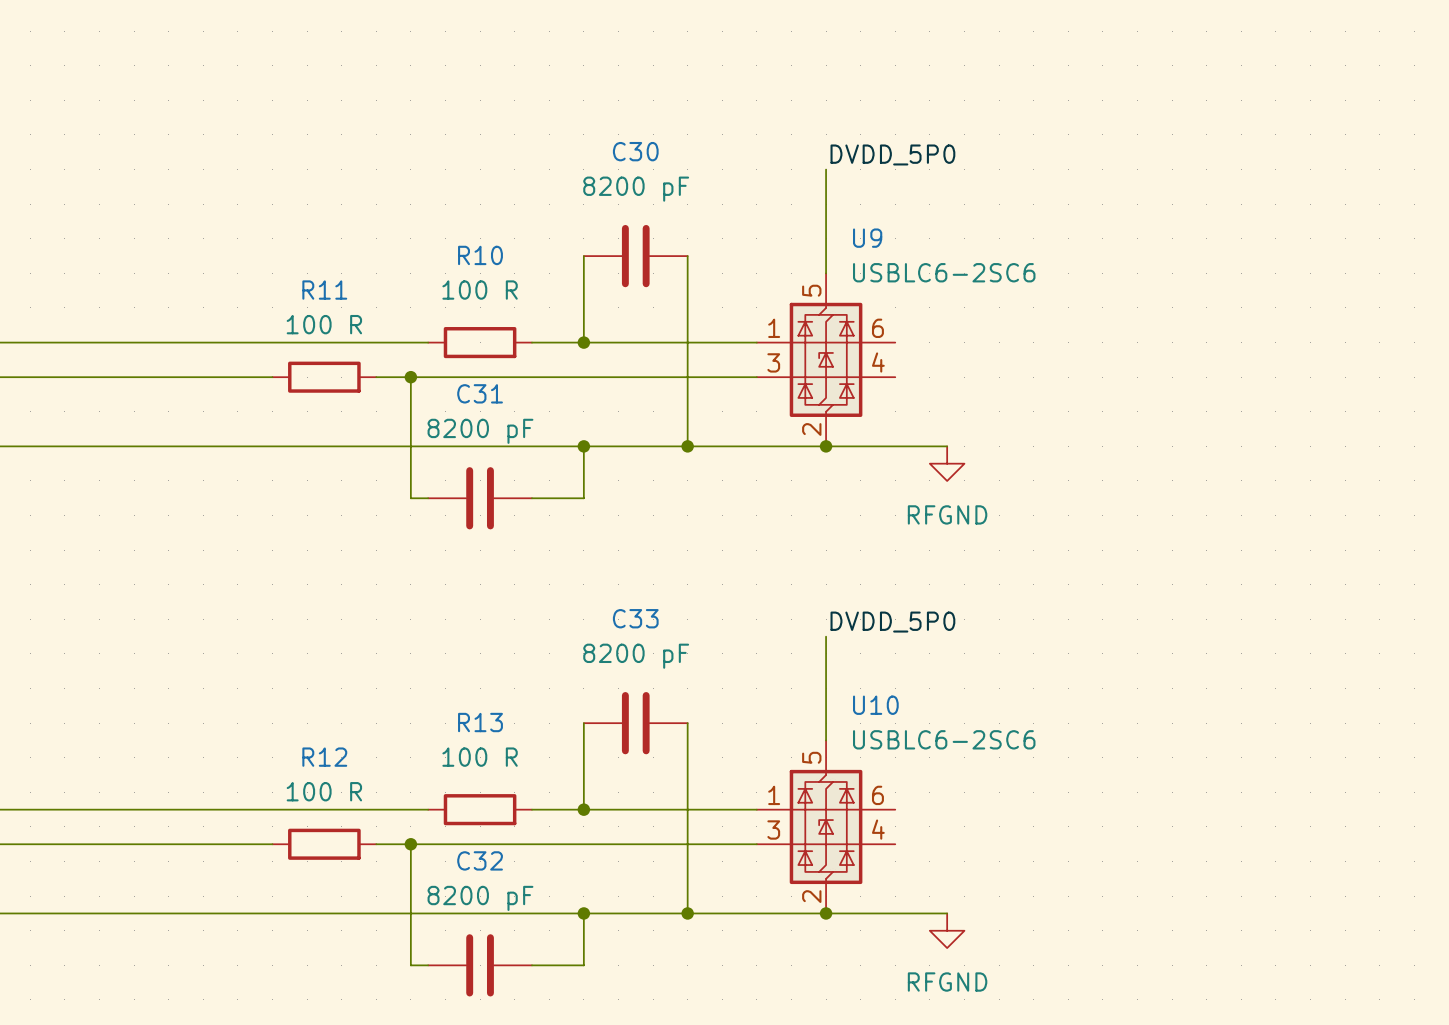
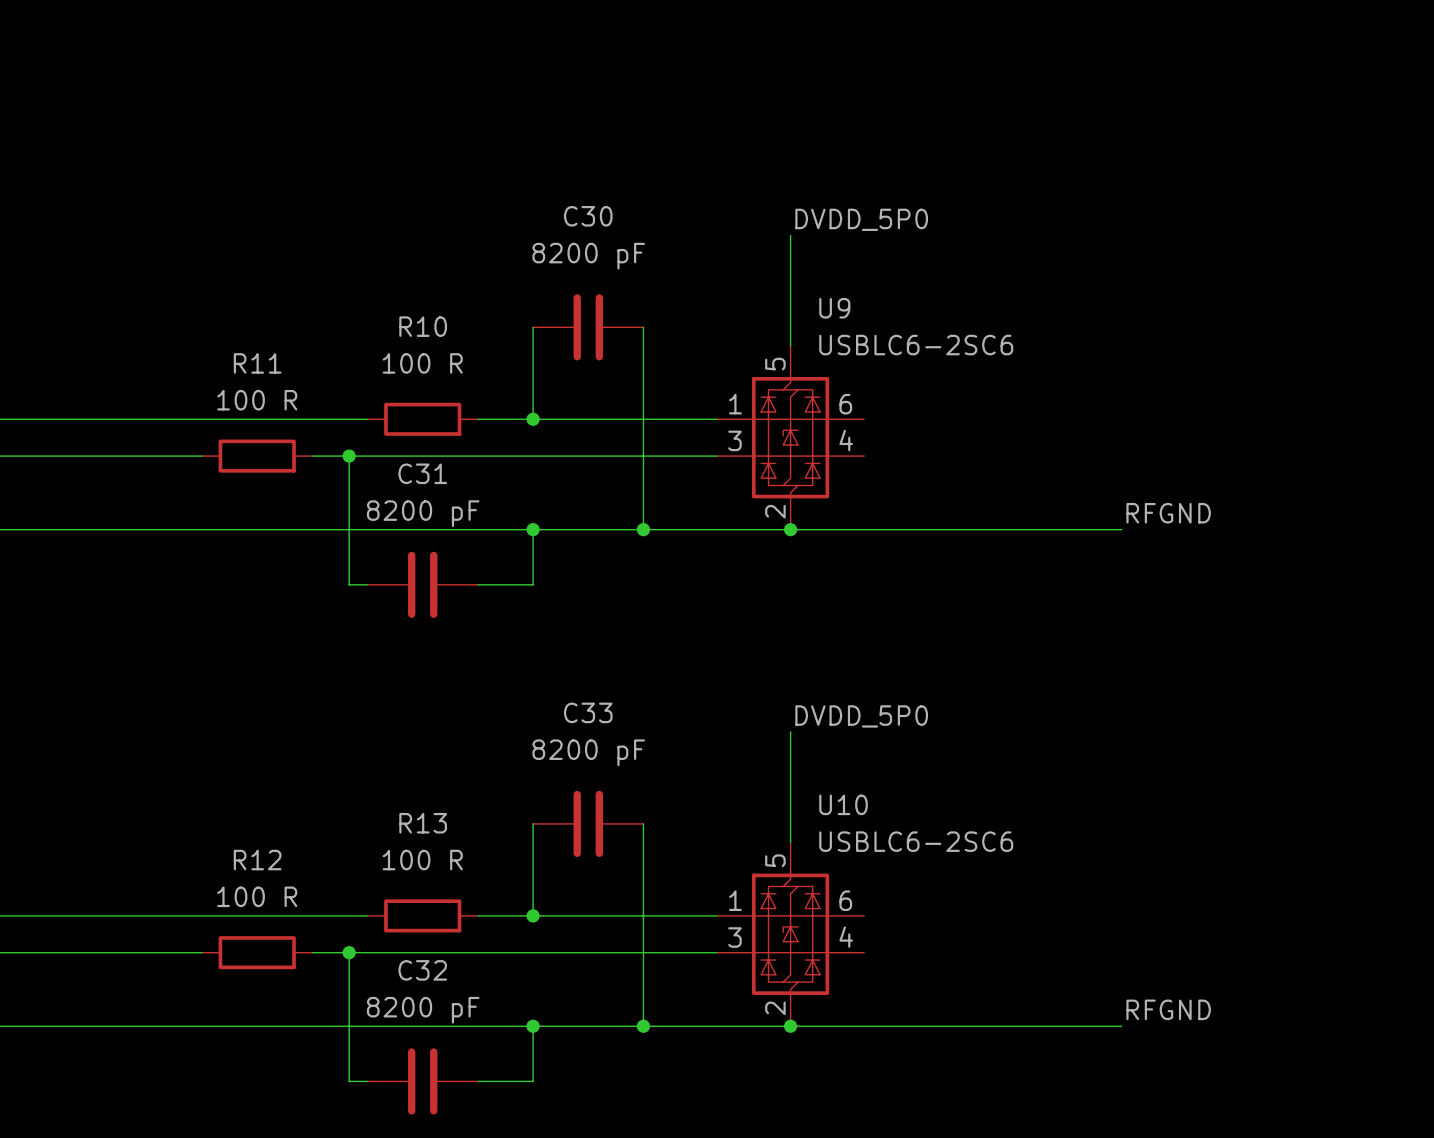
label: none -> RFGND (1168, 513)
wire: none -> (919, 529) (1121, 529)
power symbol: RFGND (947, 463) -> none
label: none -> RFGND (1168, 1009)
wire: none -> (919, 1026) (1121, 1026)
power symbol: RFGND (947, 930) -> none

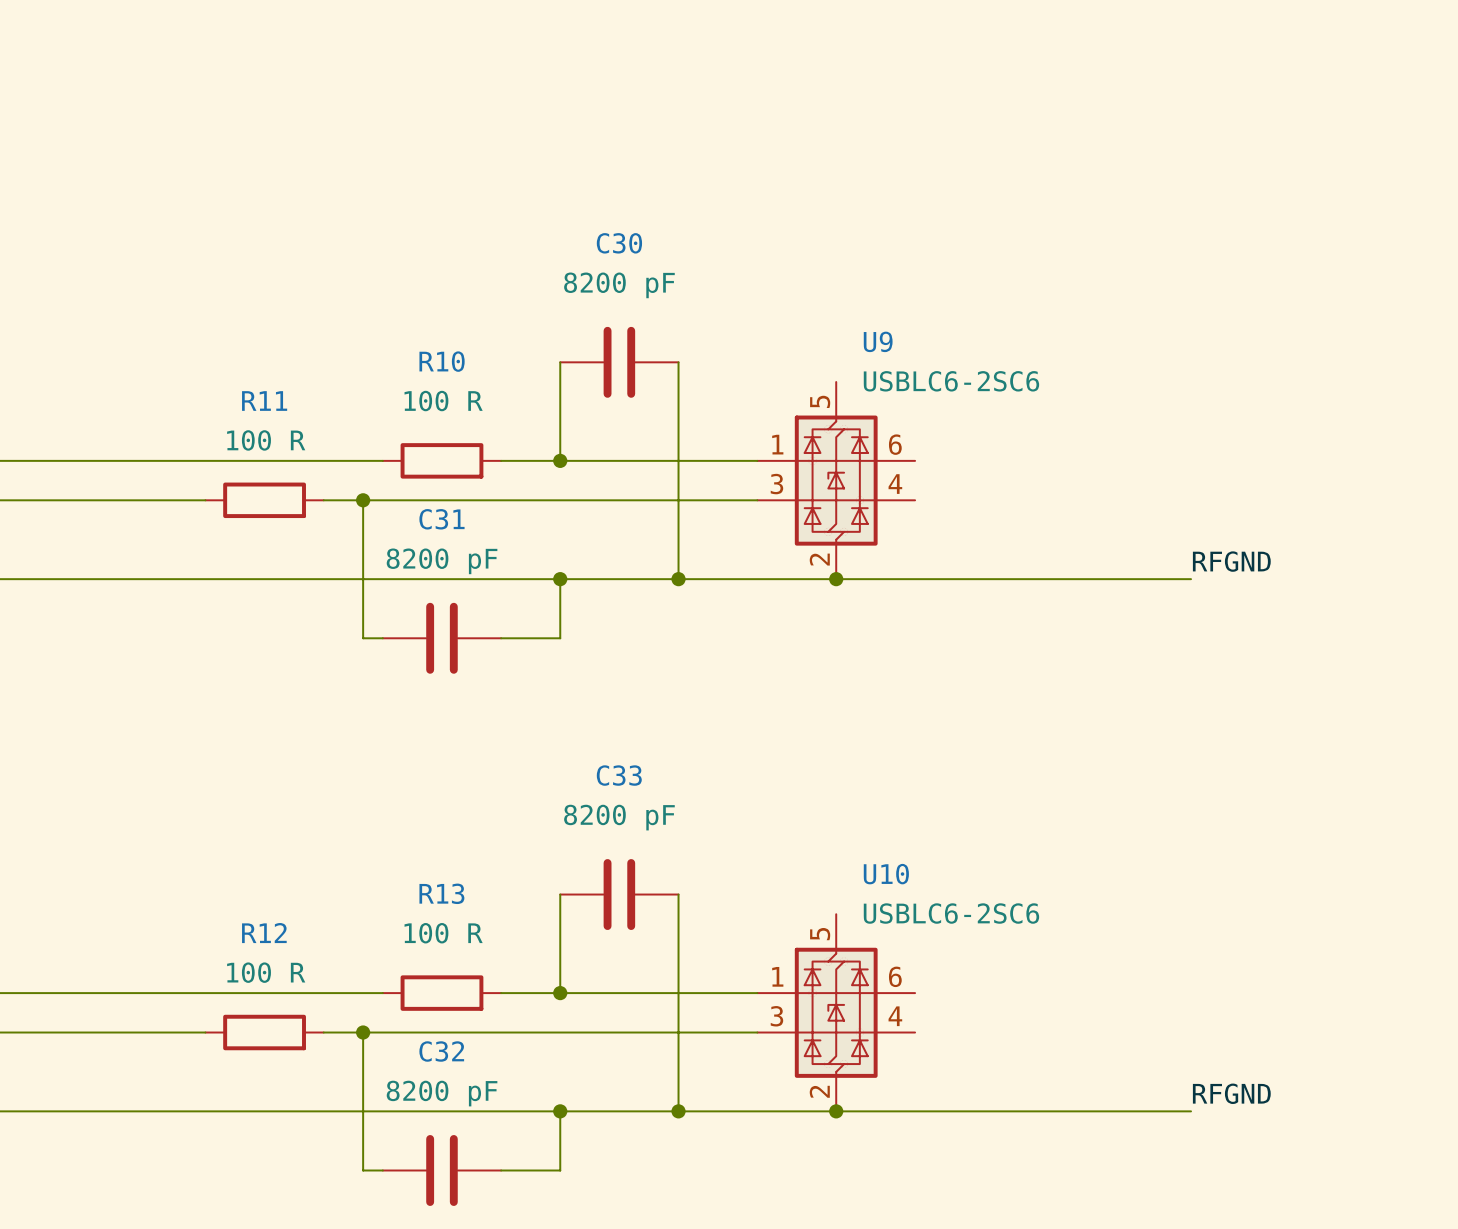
label: DVDD_5P0 (861, 219) -> none
wire: (790, 235) (790, 345) -> none
label: DVDD_5P0 (861, 716) -> none
wire: (790, 731) (790, 842) -> none

